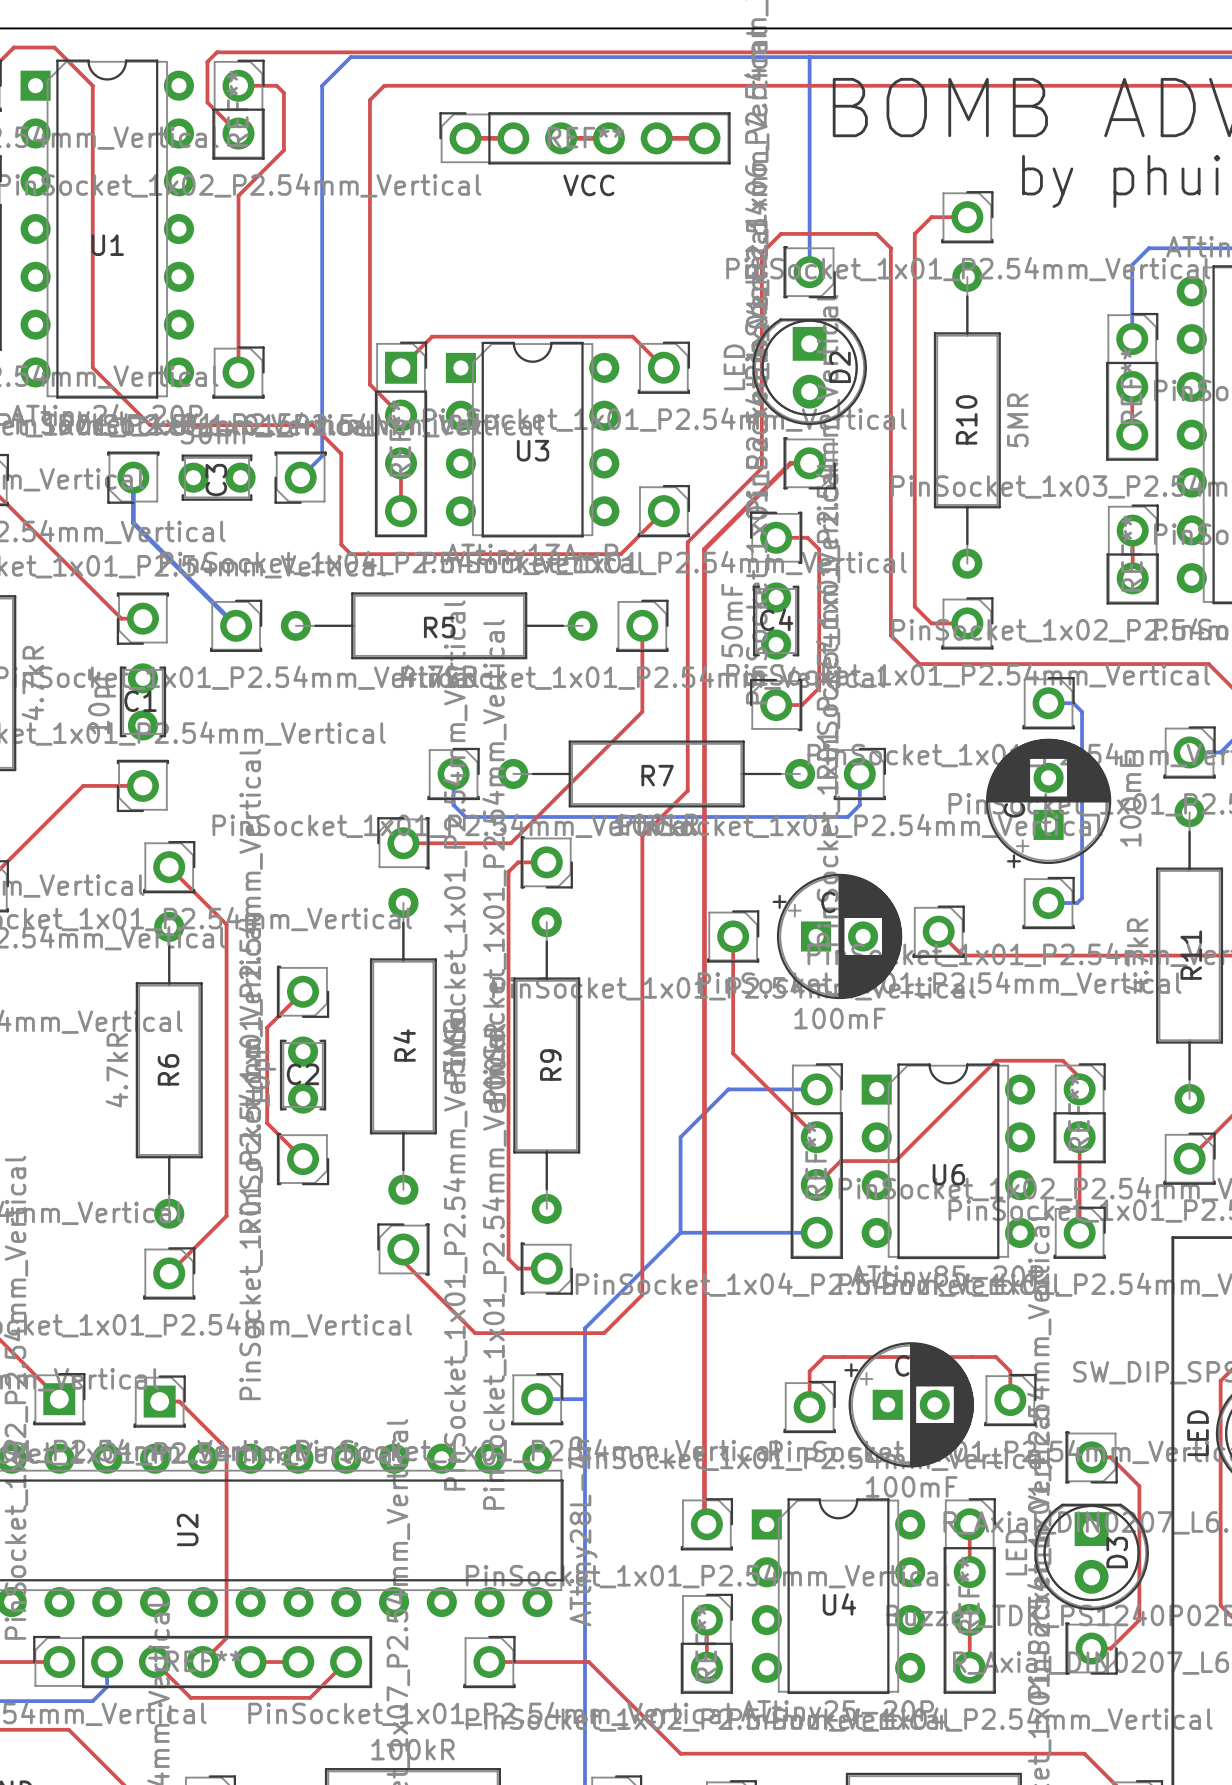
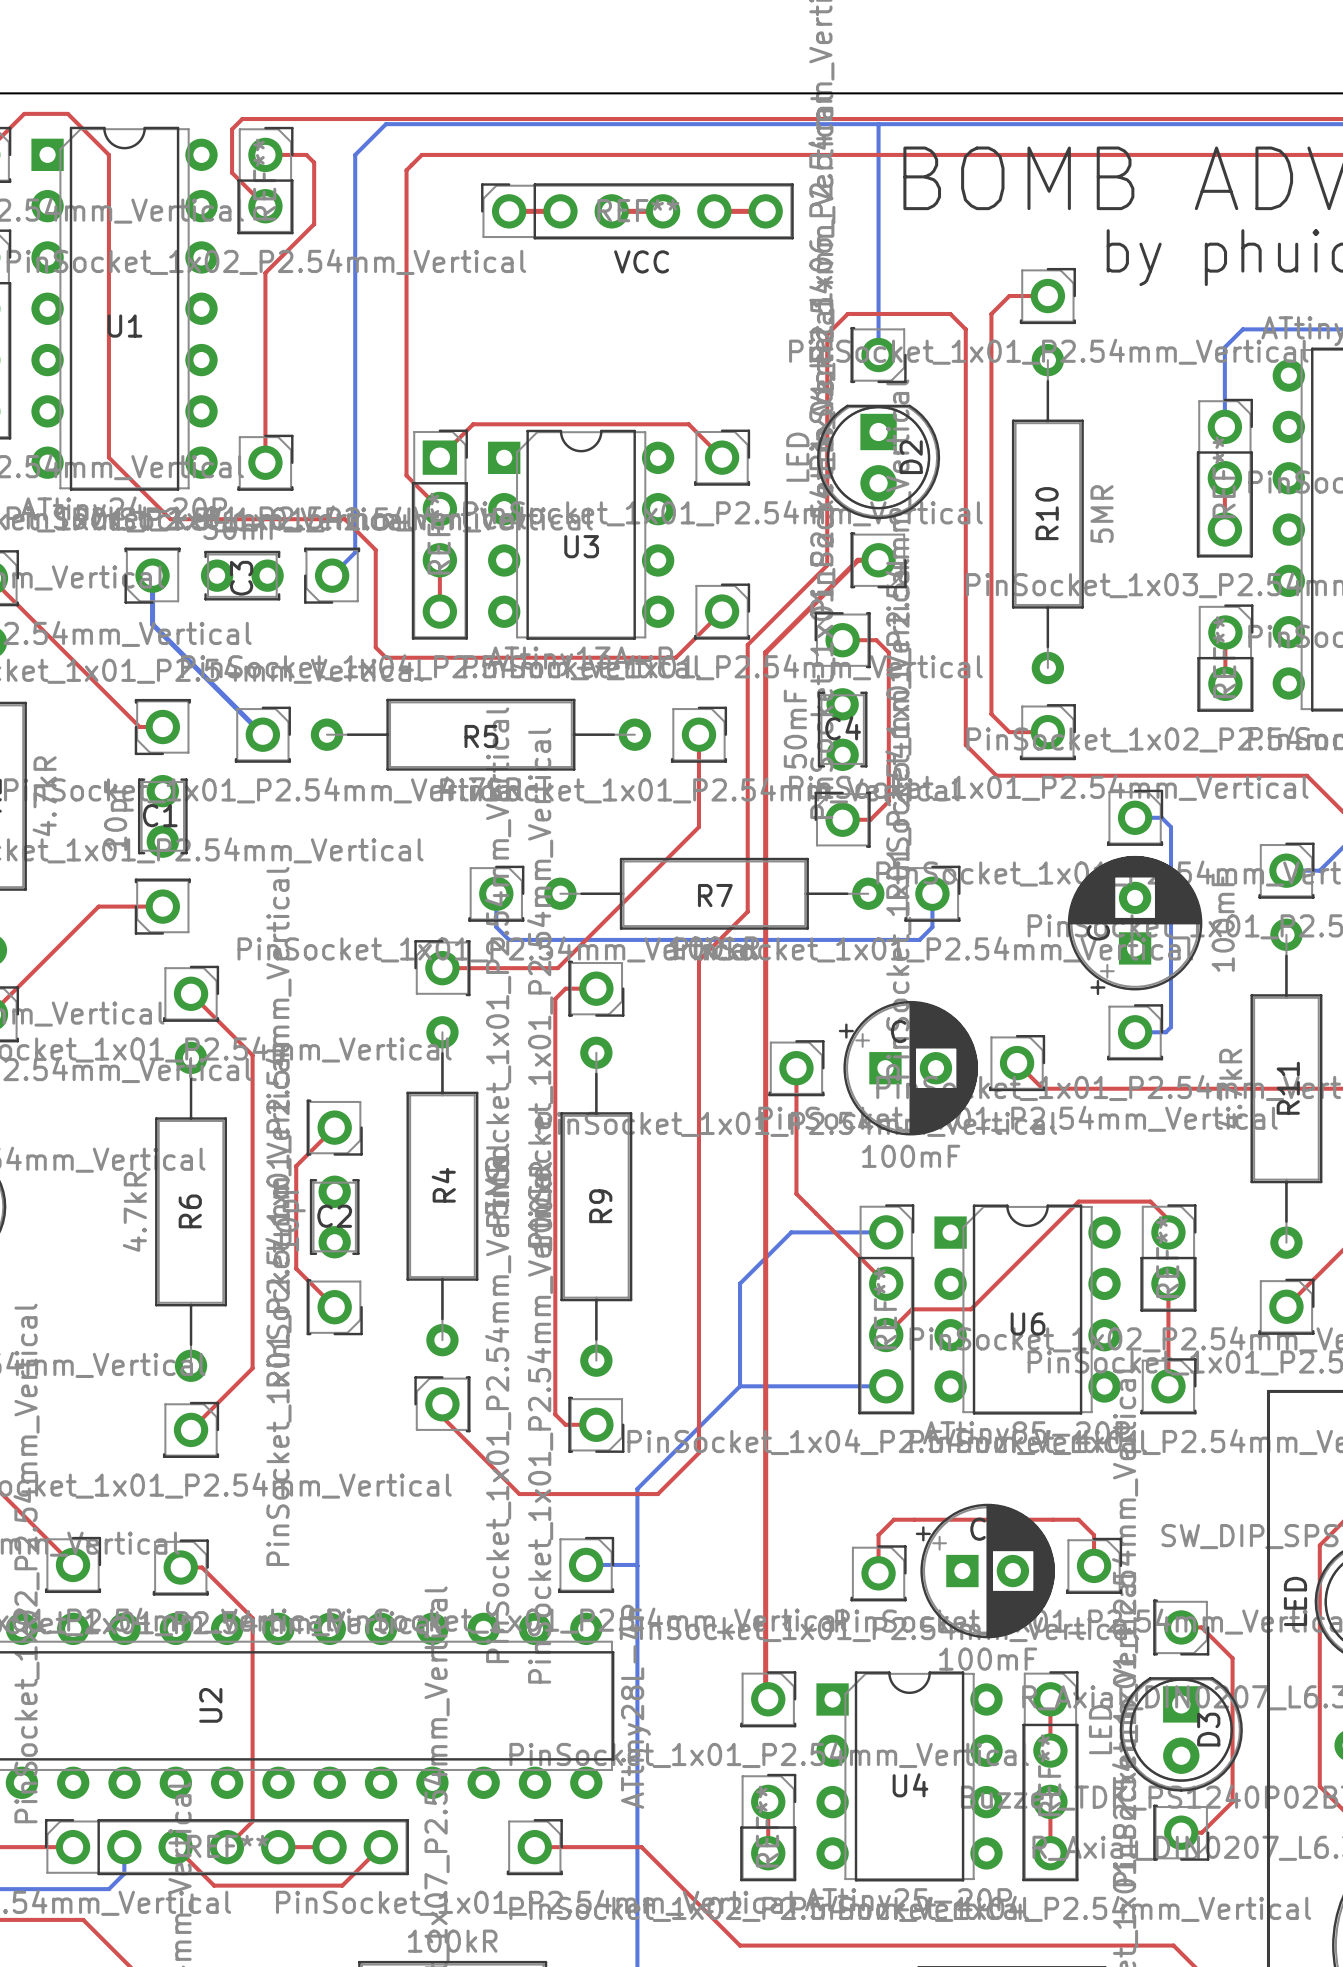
part footprint: [33, 1373, 86, 1426] -> [44, 1536, 102, 1594]
part footprint: [133, 1375, 186, 1428] -> [152, 1539, 209, 1596]

